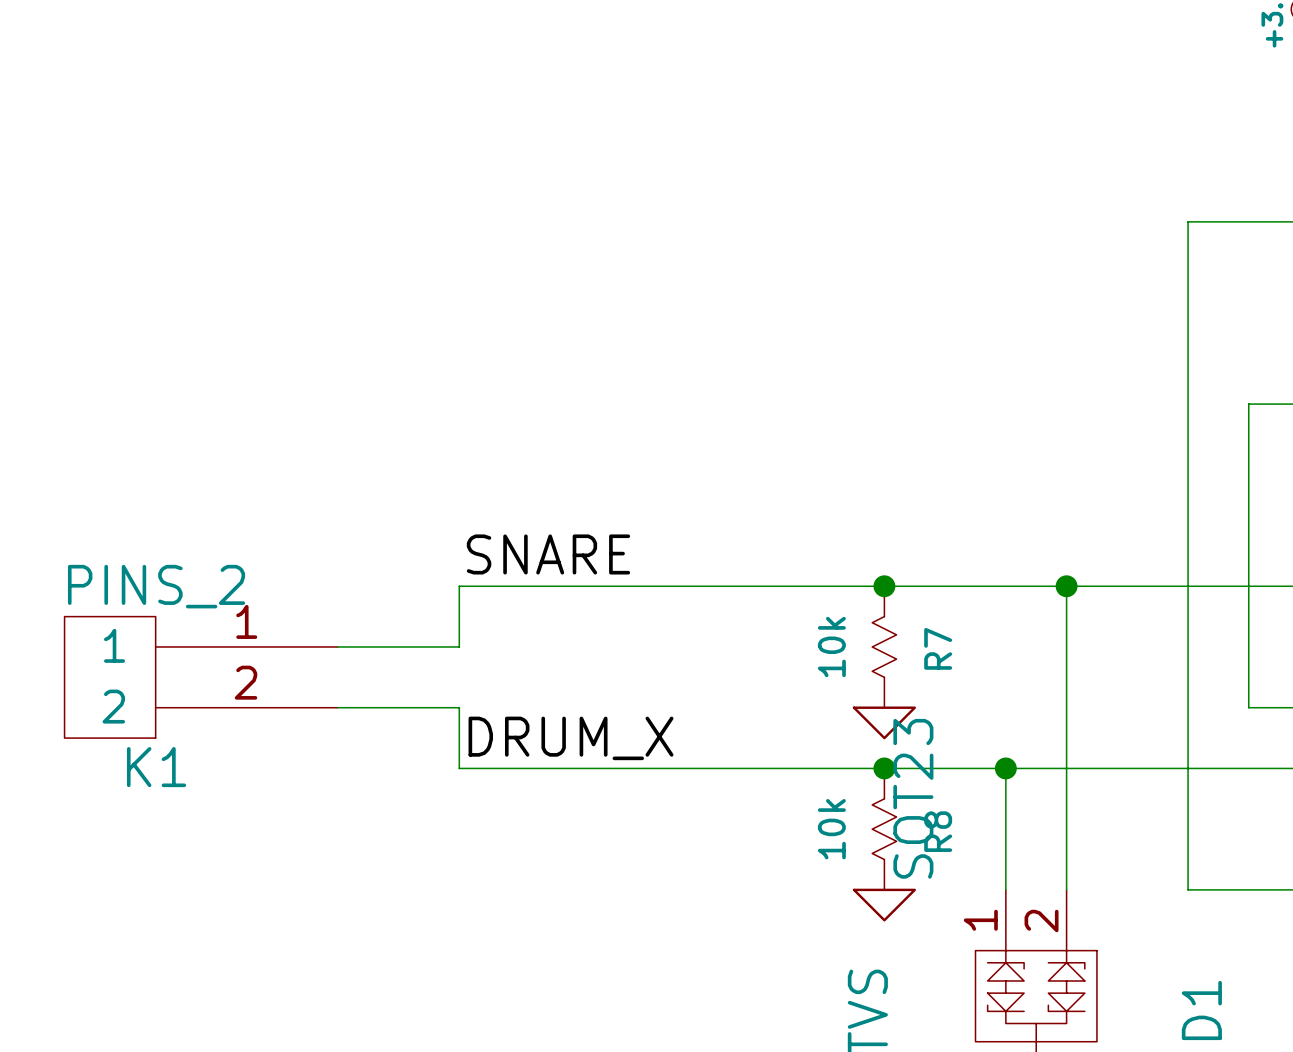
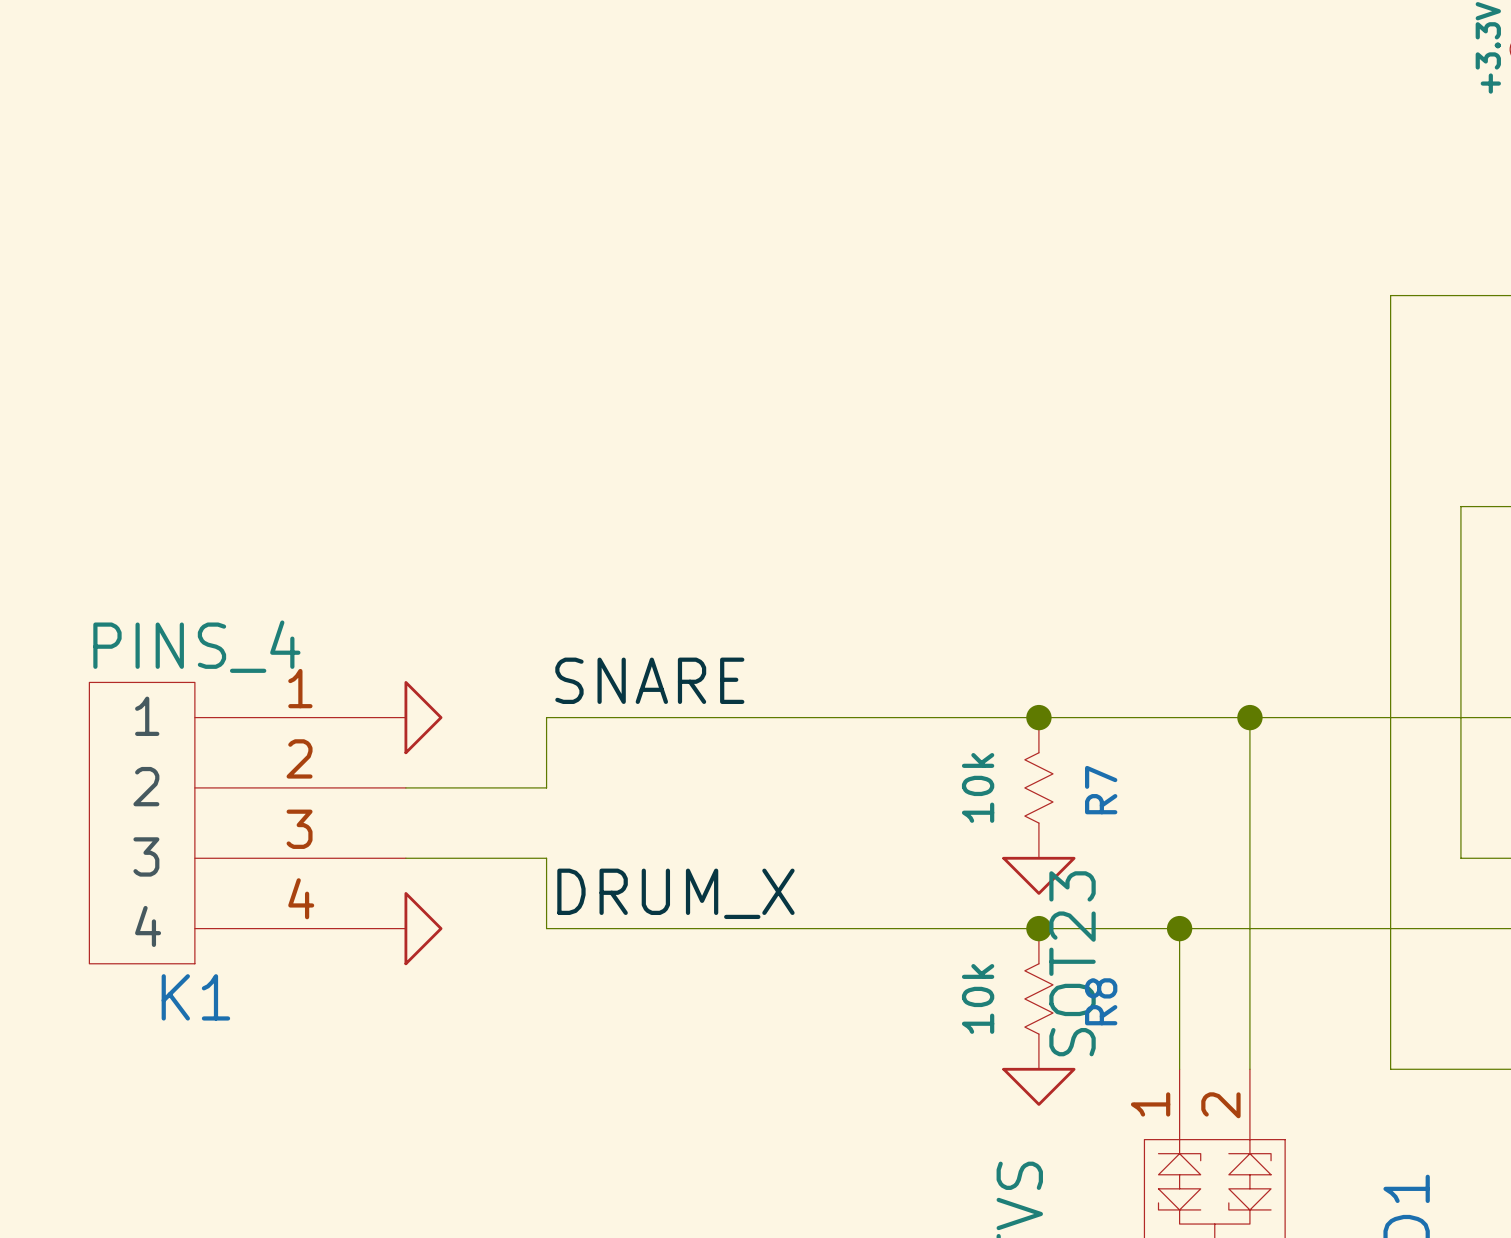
K1 value: PINS_2 (156, 586) -> PINS_4 (196, 646)
power symbol: none -> (423, 717)
K1 symbol: [64, 616, 338, 739] -> [89, 682, 406, 964]
K1 name position: K1 (156, 767) -> K1 (195, 997)
power symbol: none -> (423, 928)

